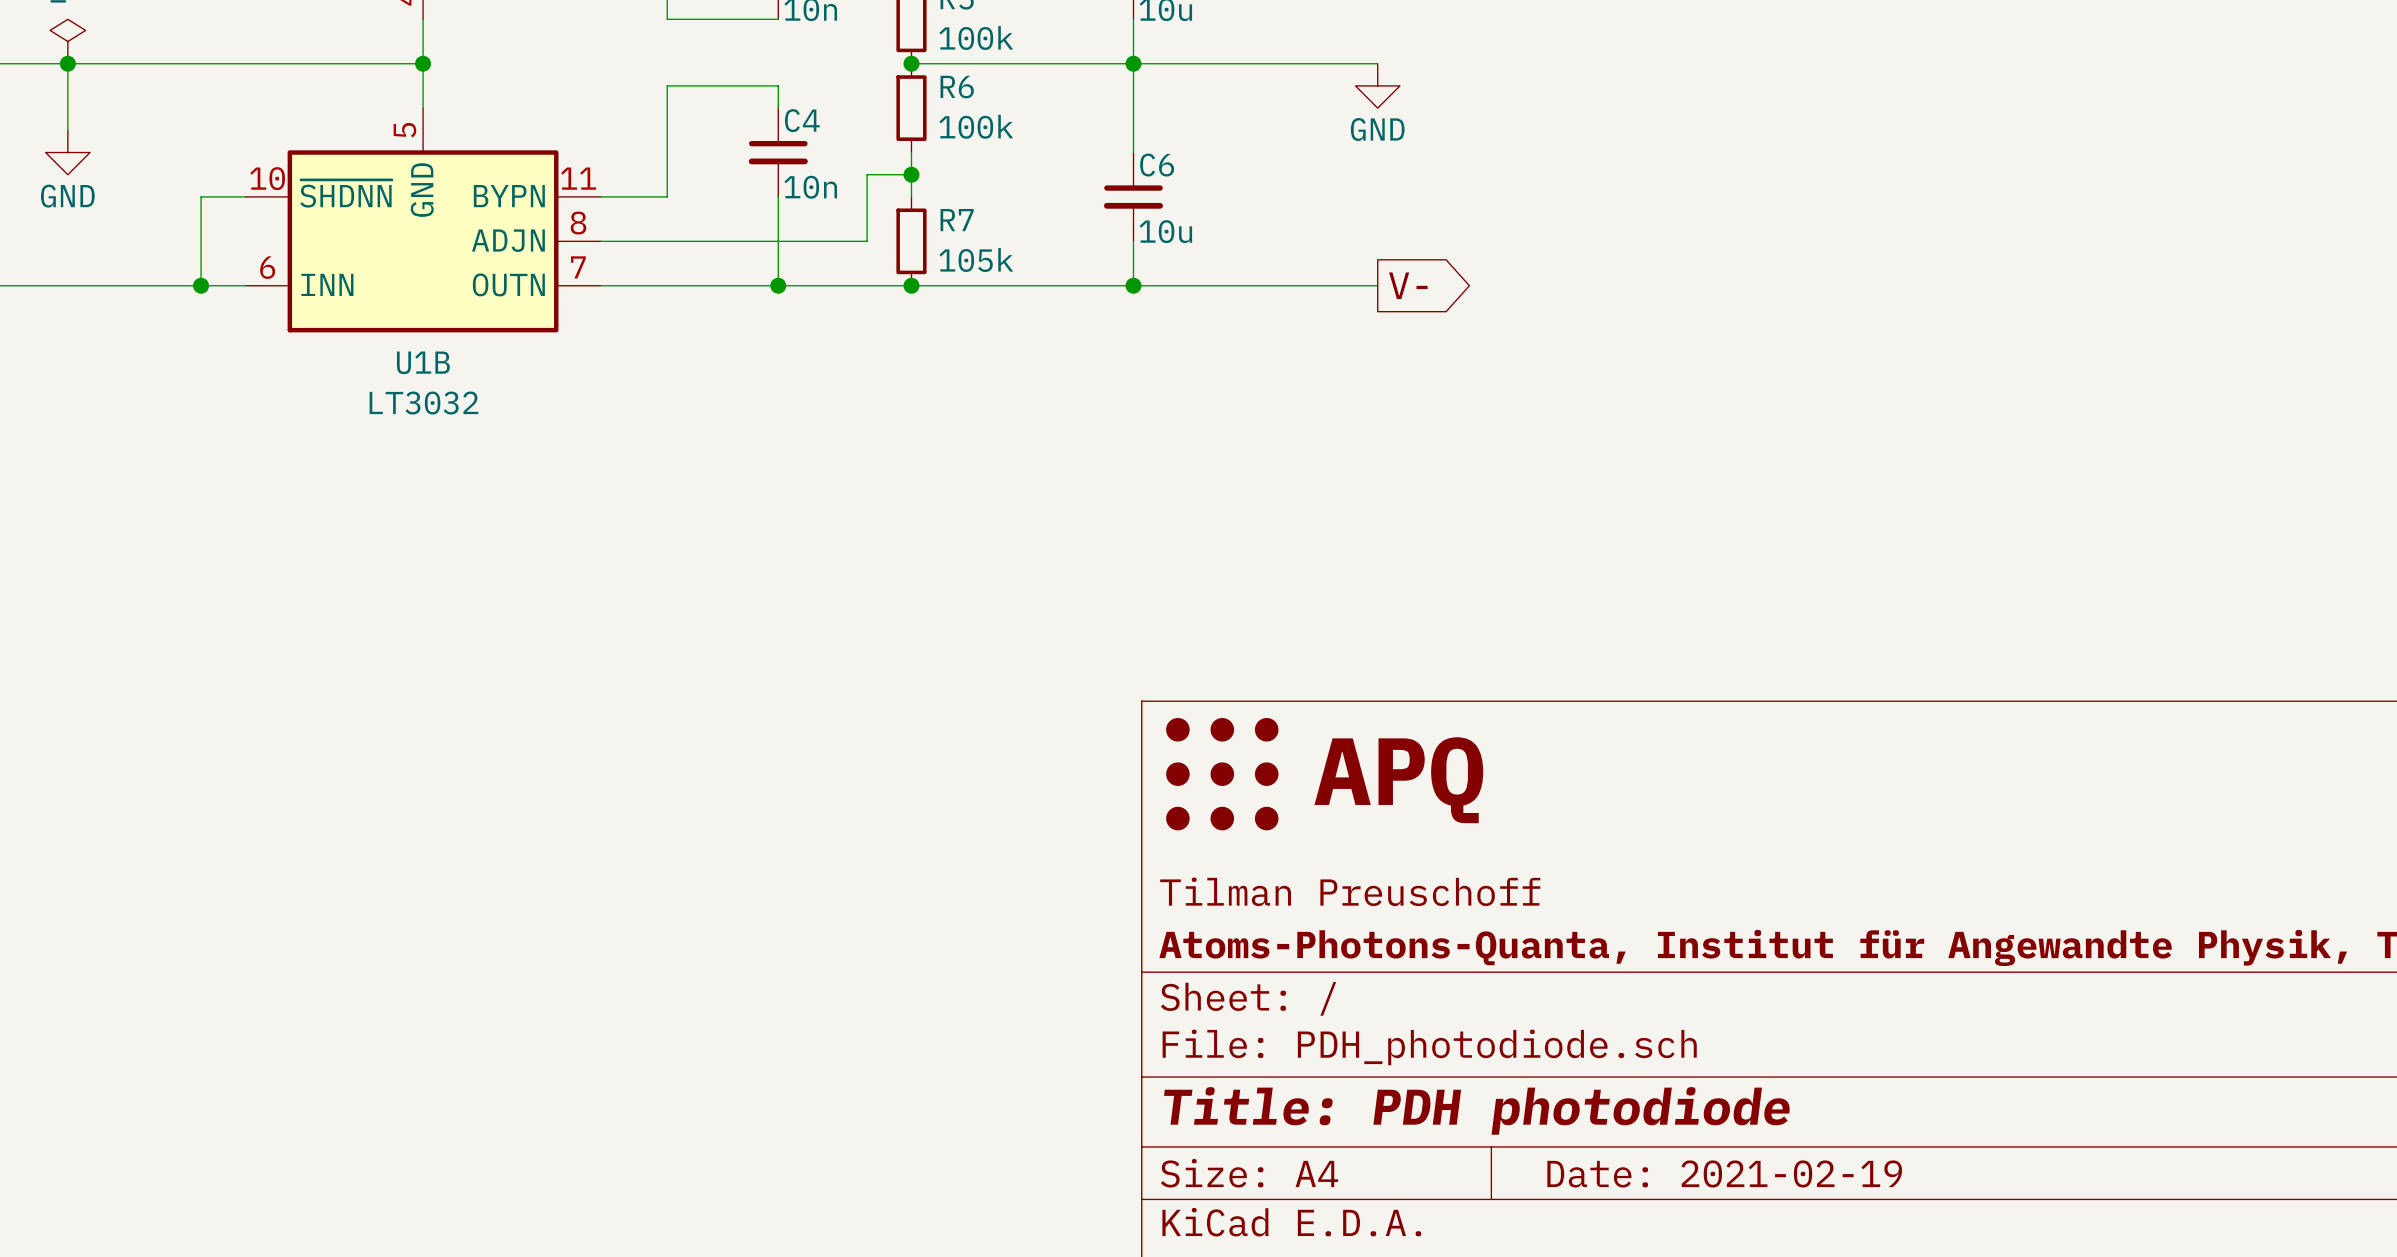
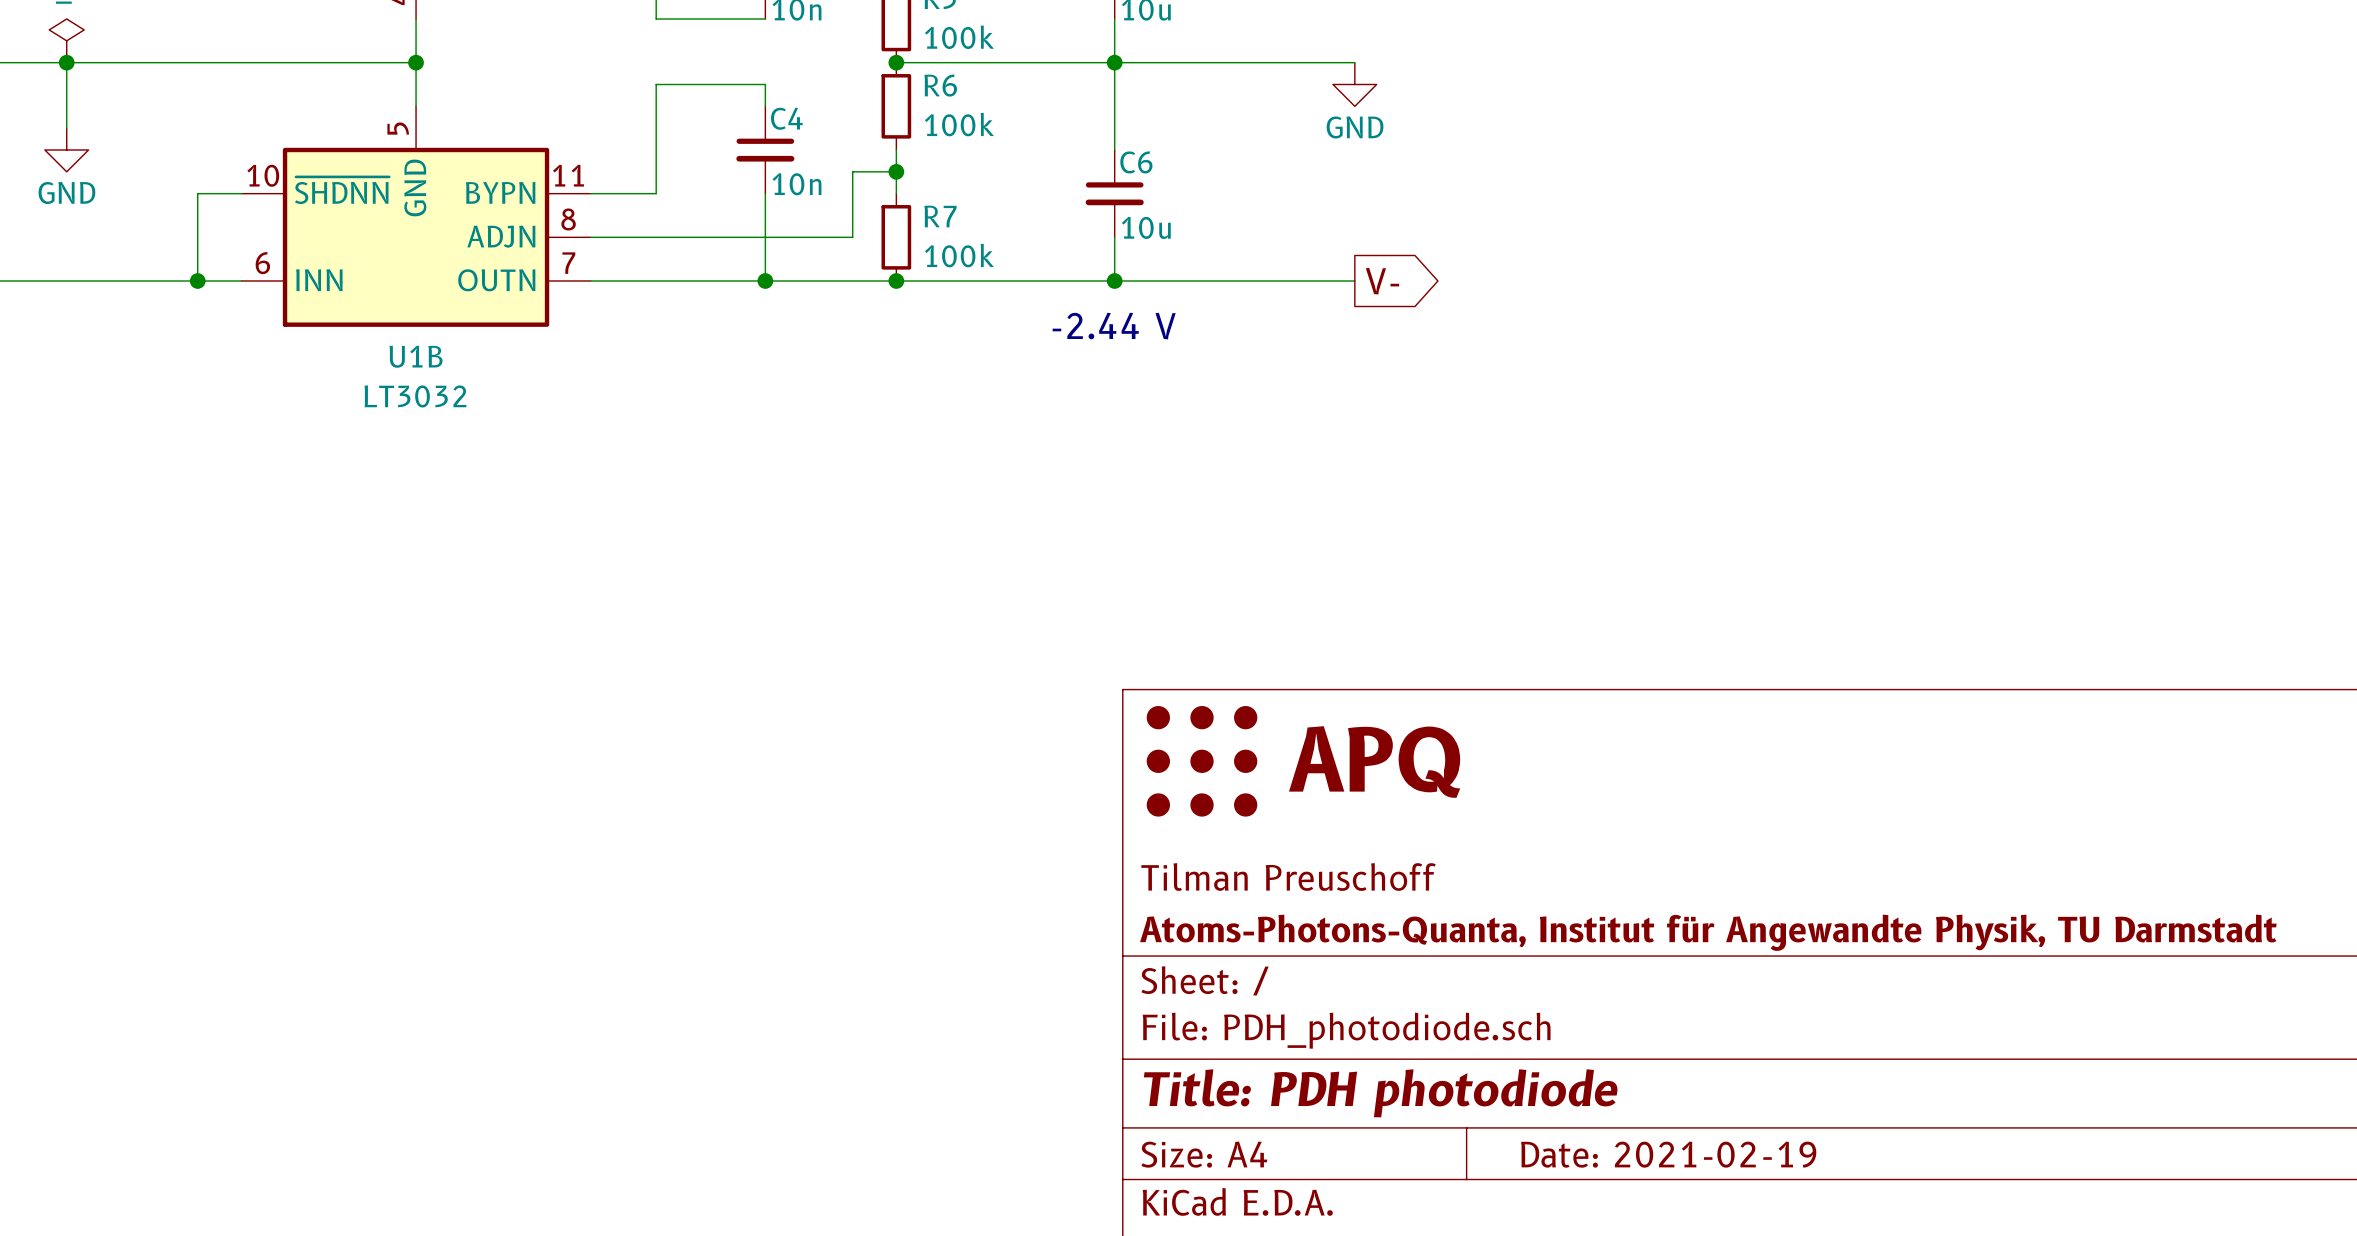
R7 value: 105k (976, 260) -> 100k (959, 255)
text: none -> -2.44 V (1114, 326)

